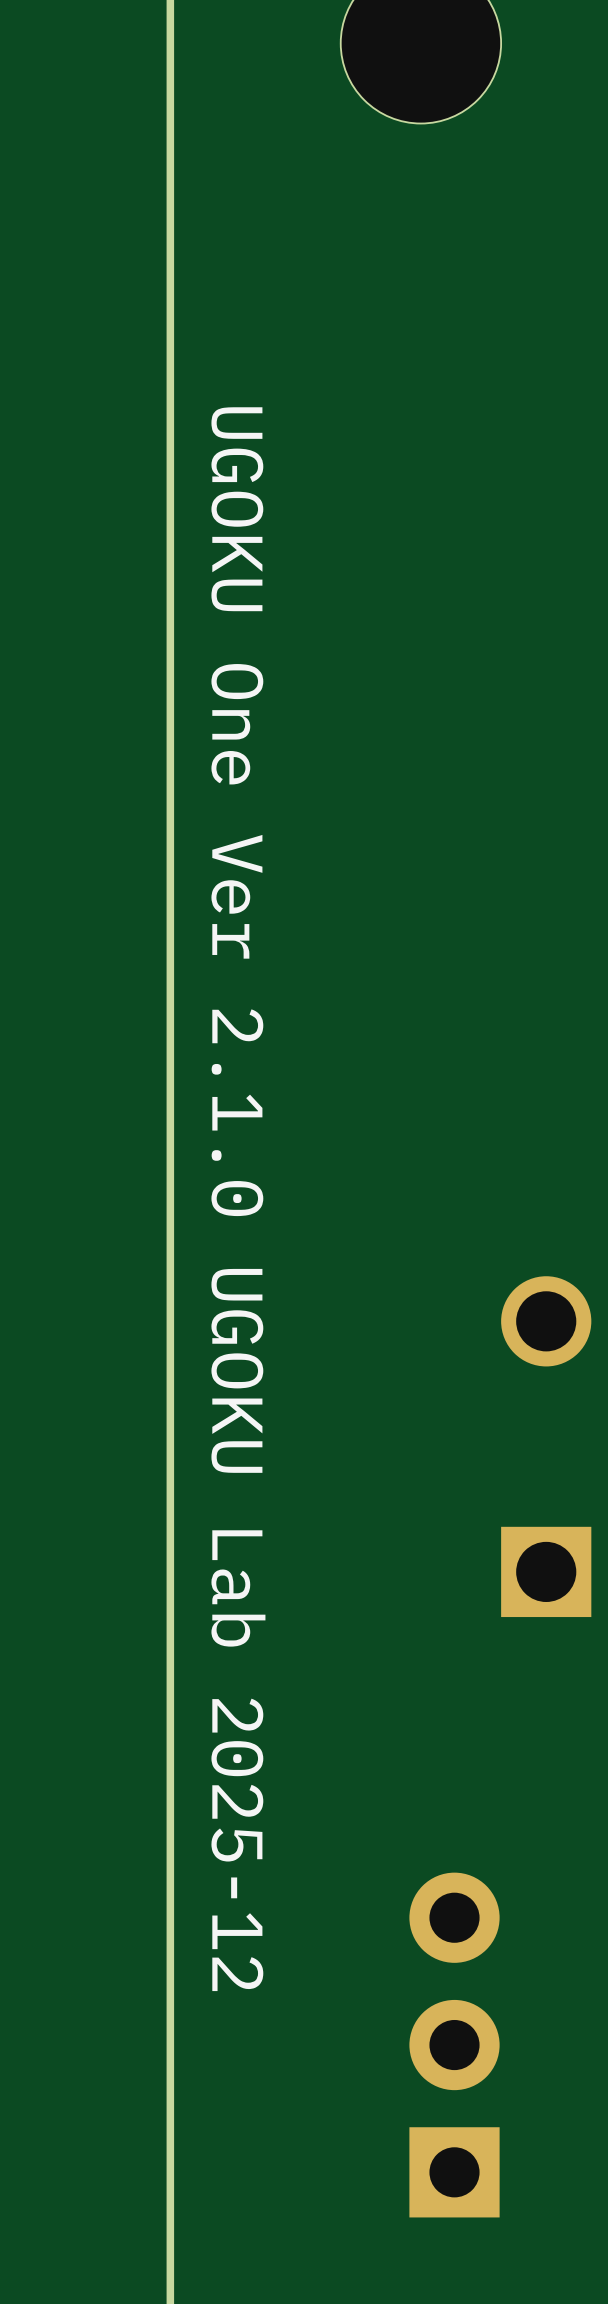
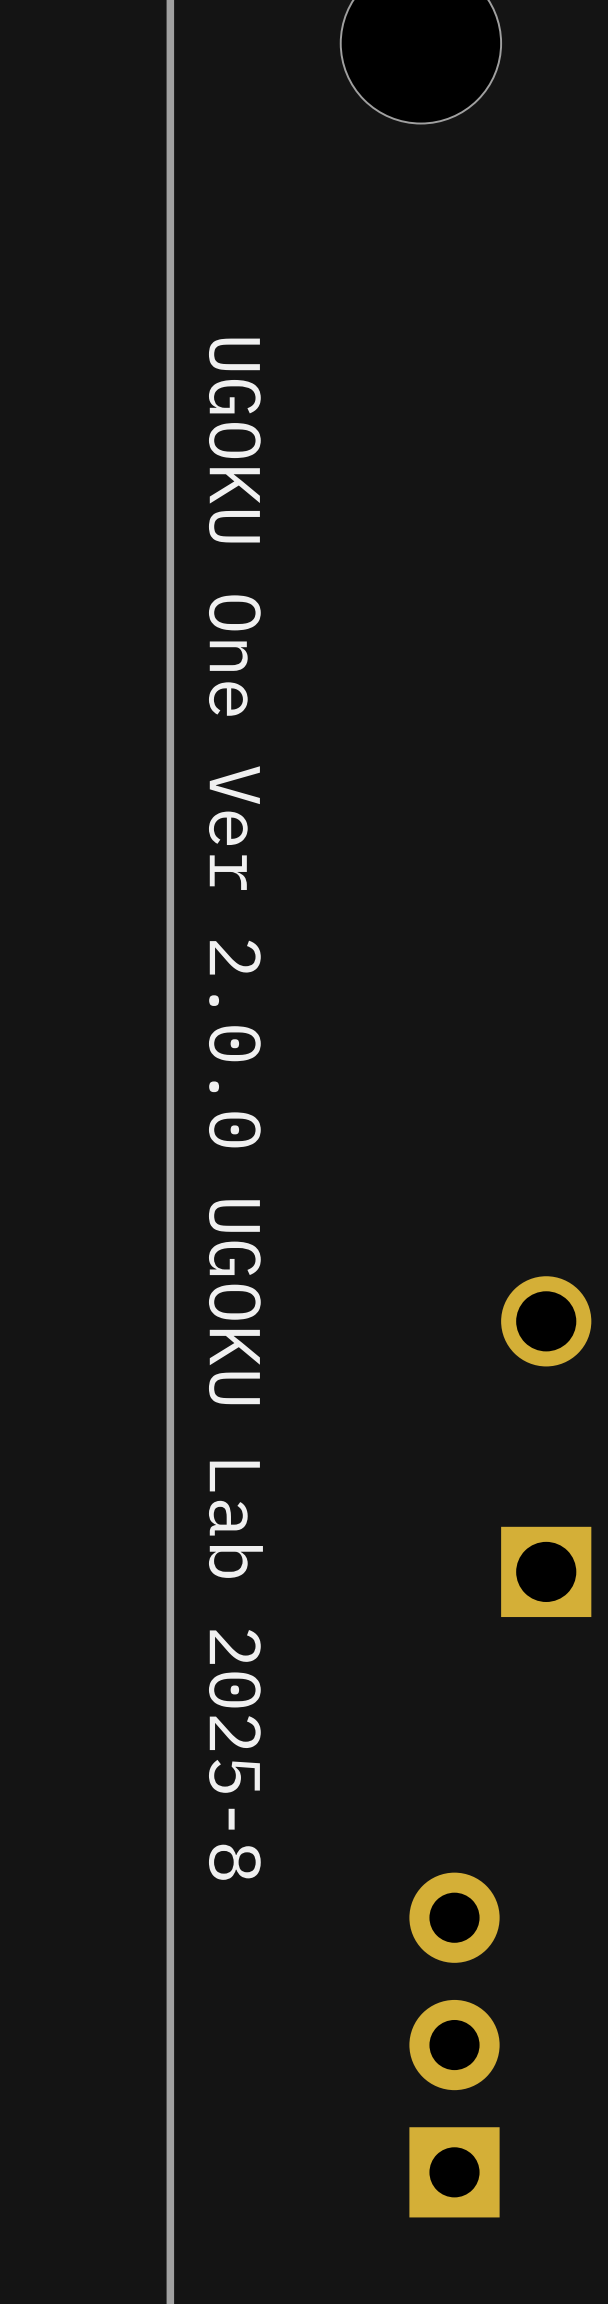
text: UGOKU One Ver 2.1.0 UGOKU Lab 2025-12 (238, 1199) -> UGOKU One Ver 2.0.0 UGOKU Lab 2025-8 (235, 1109)

